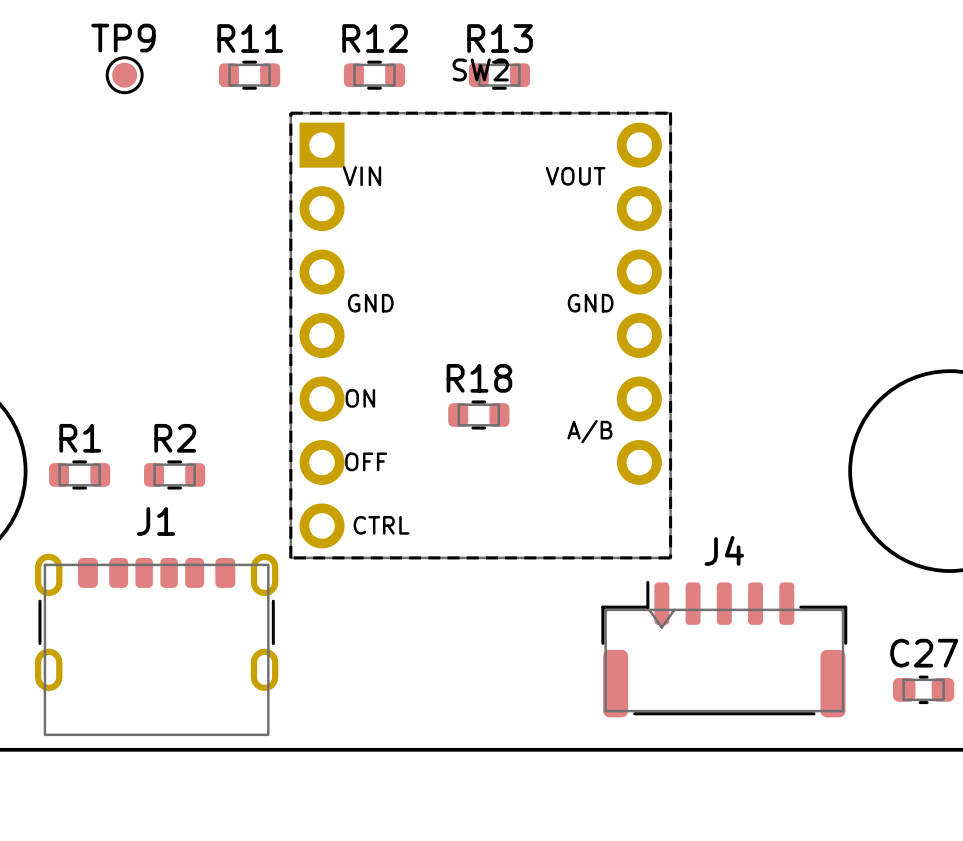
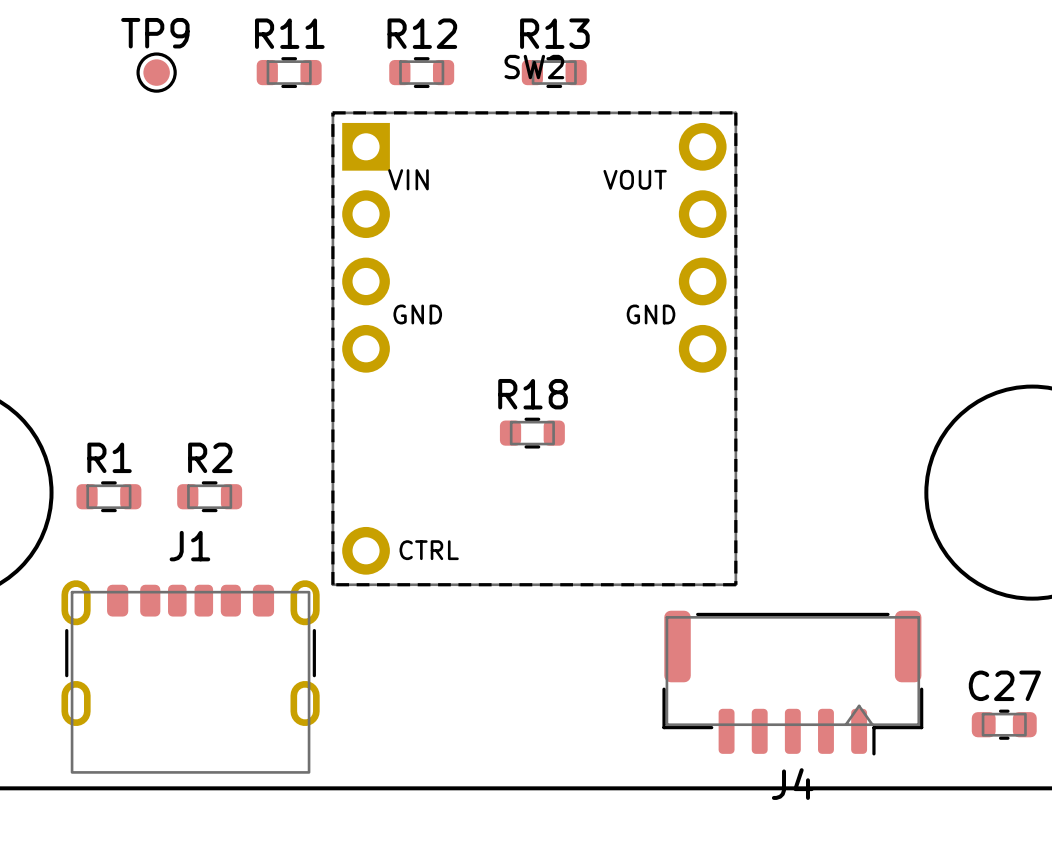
SW2 footprint: [289, 111, 673, 560] -> [331, 111, 738, 587]
J4 rotation: 0° (724, 649) -> 180° (792, 683)

